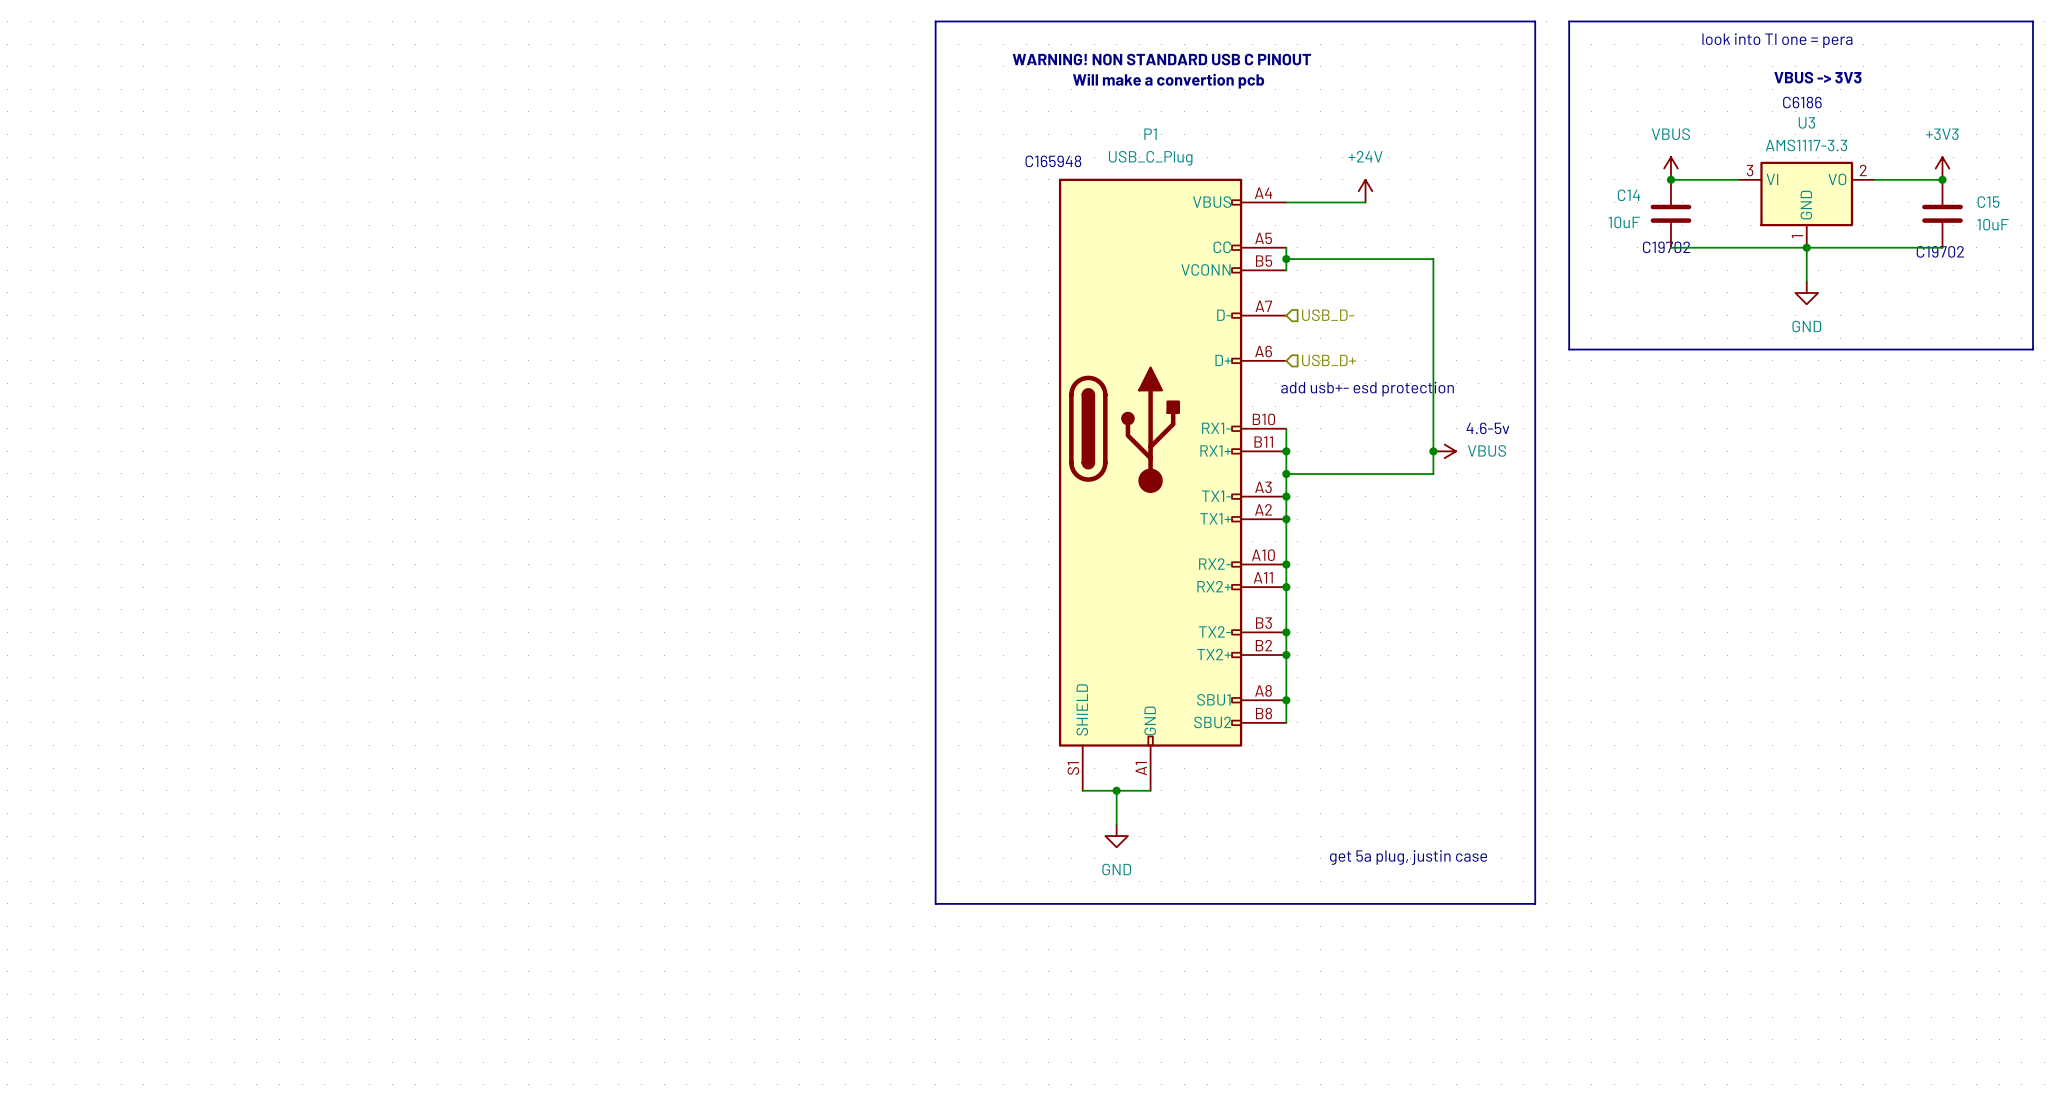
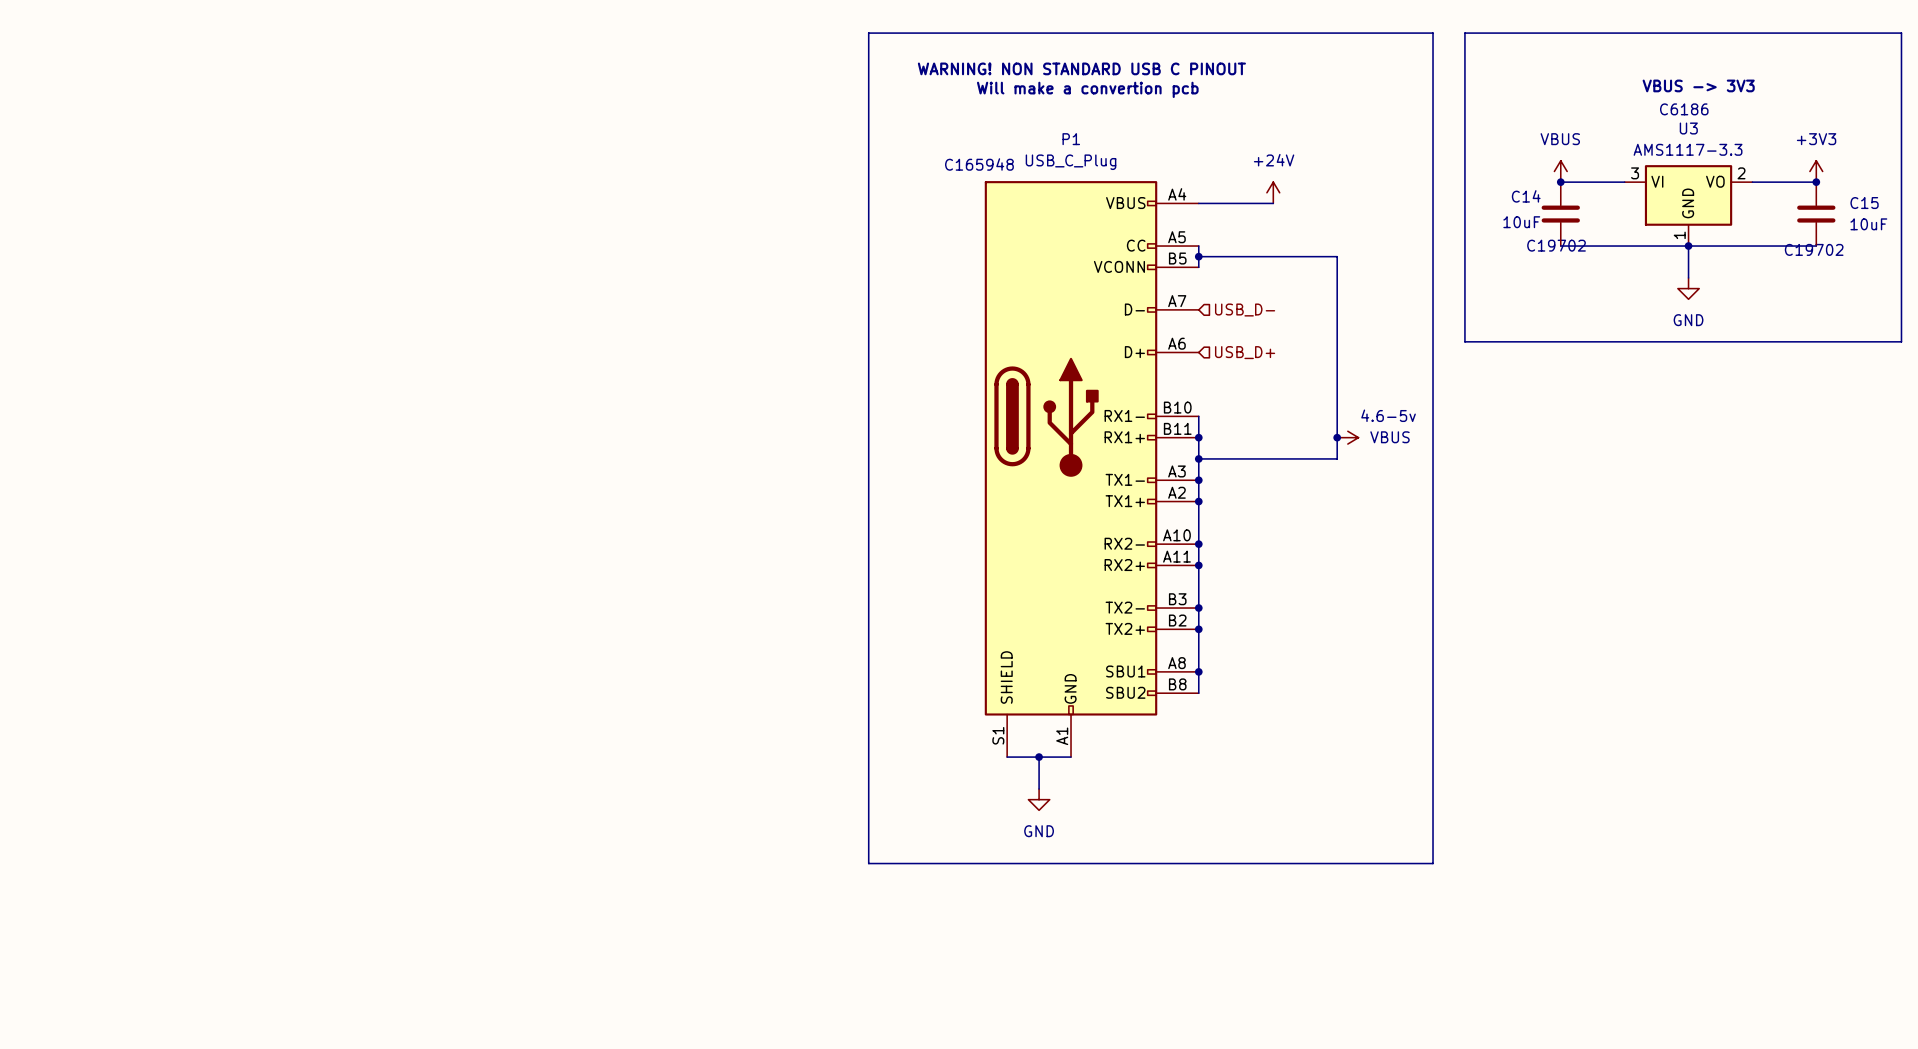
text: look into TI one = pera (1777, 40) -> none
text: add usb+- esd protection (1367, 389) -> none
text: get 5a plug, justin case (1408, 857) -> none

